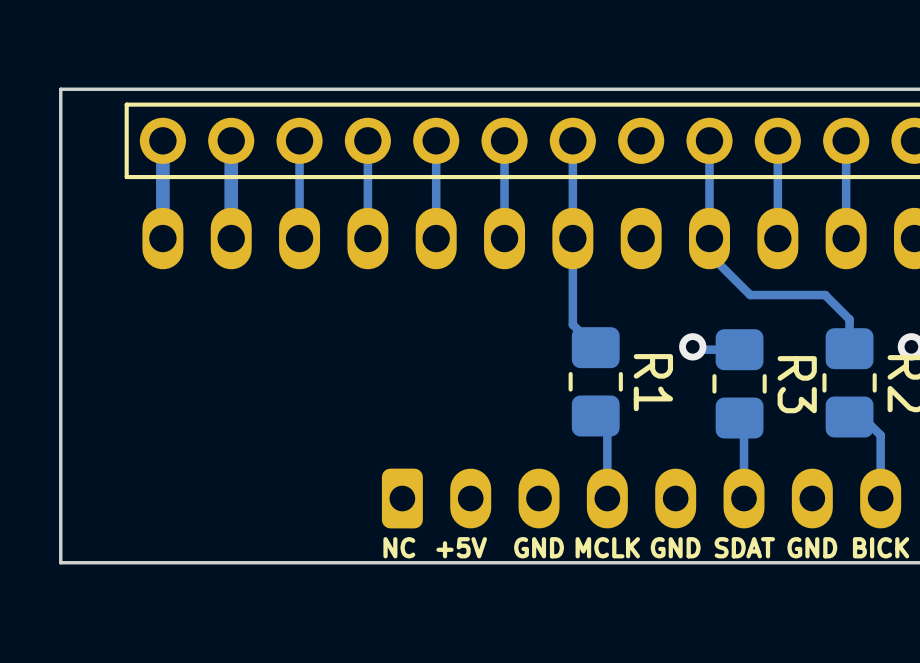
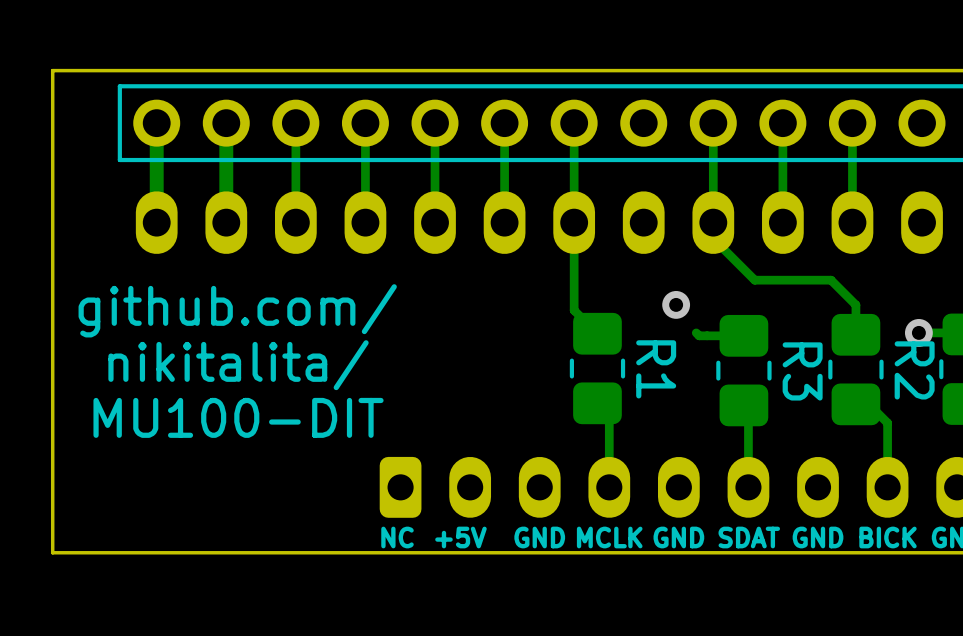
text: none -> github.com/ (237, 310)
via position: (692, 346) -> (676, 304)
text: none -> nikitalita/ (238, 365)
text: none -> MU100-DIT (238, 417)

